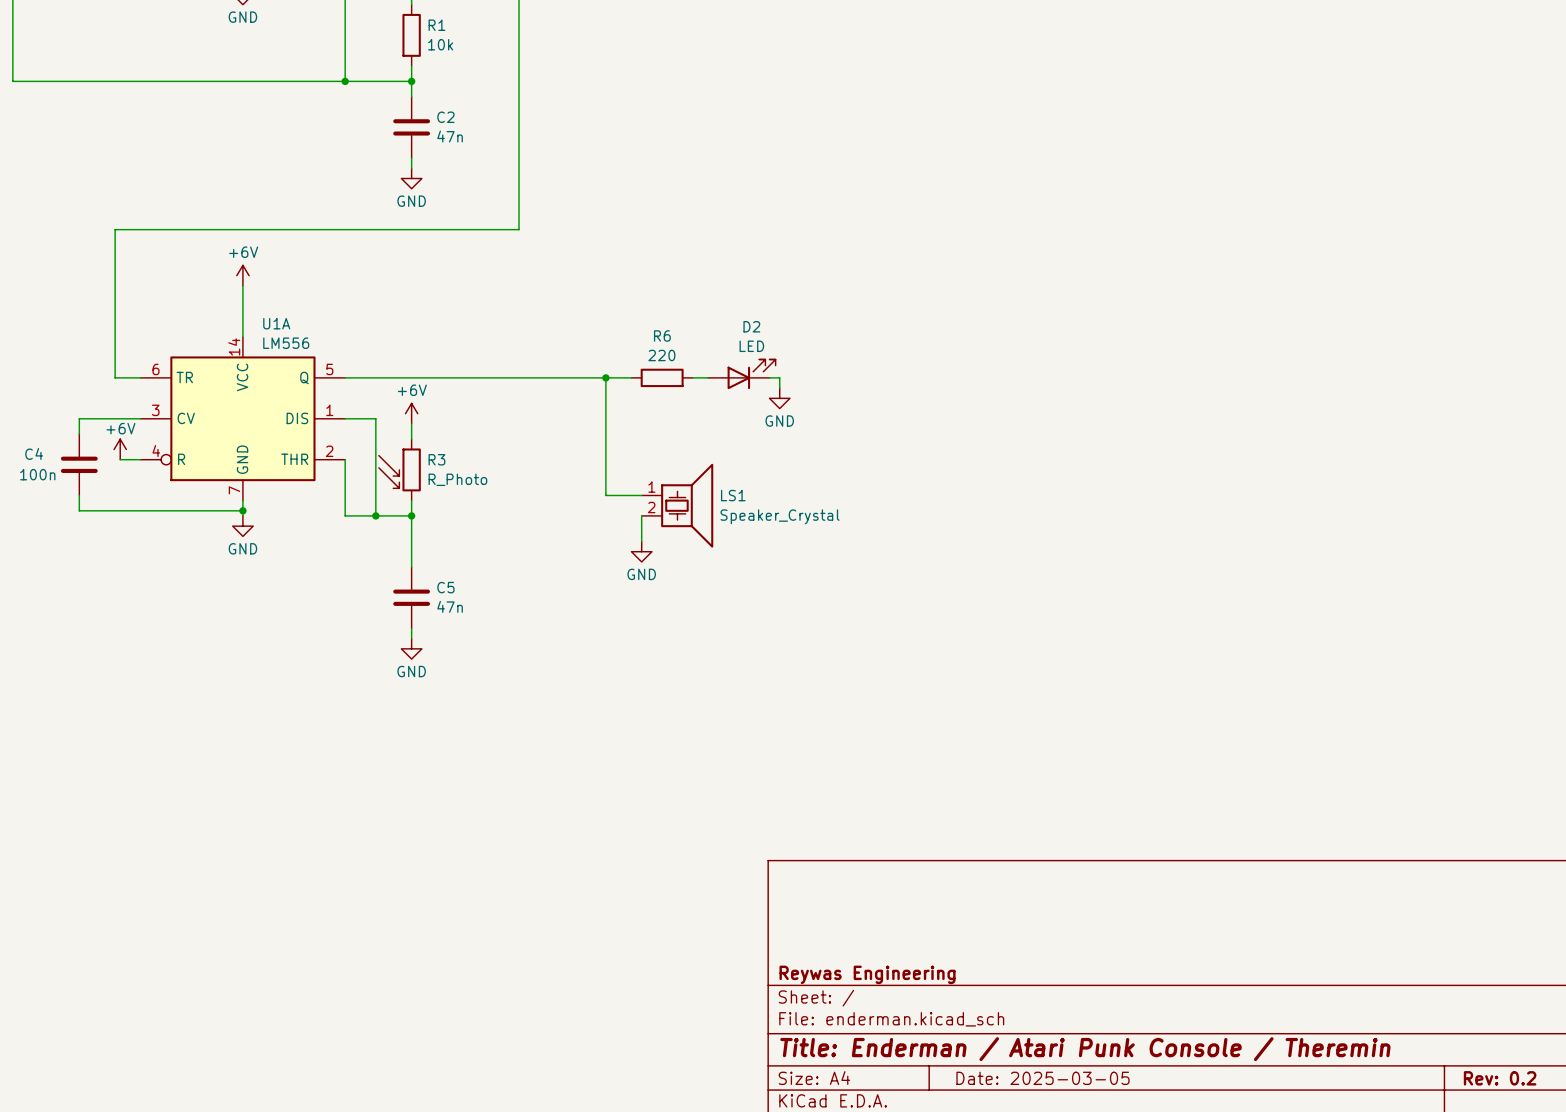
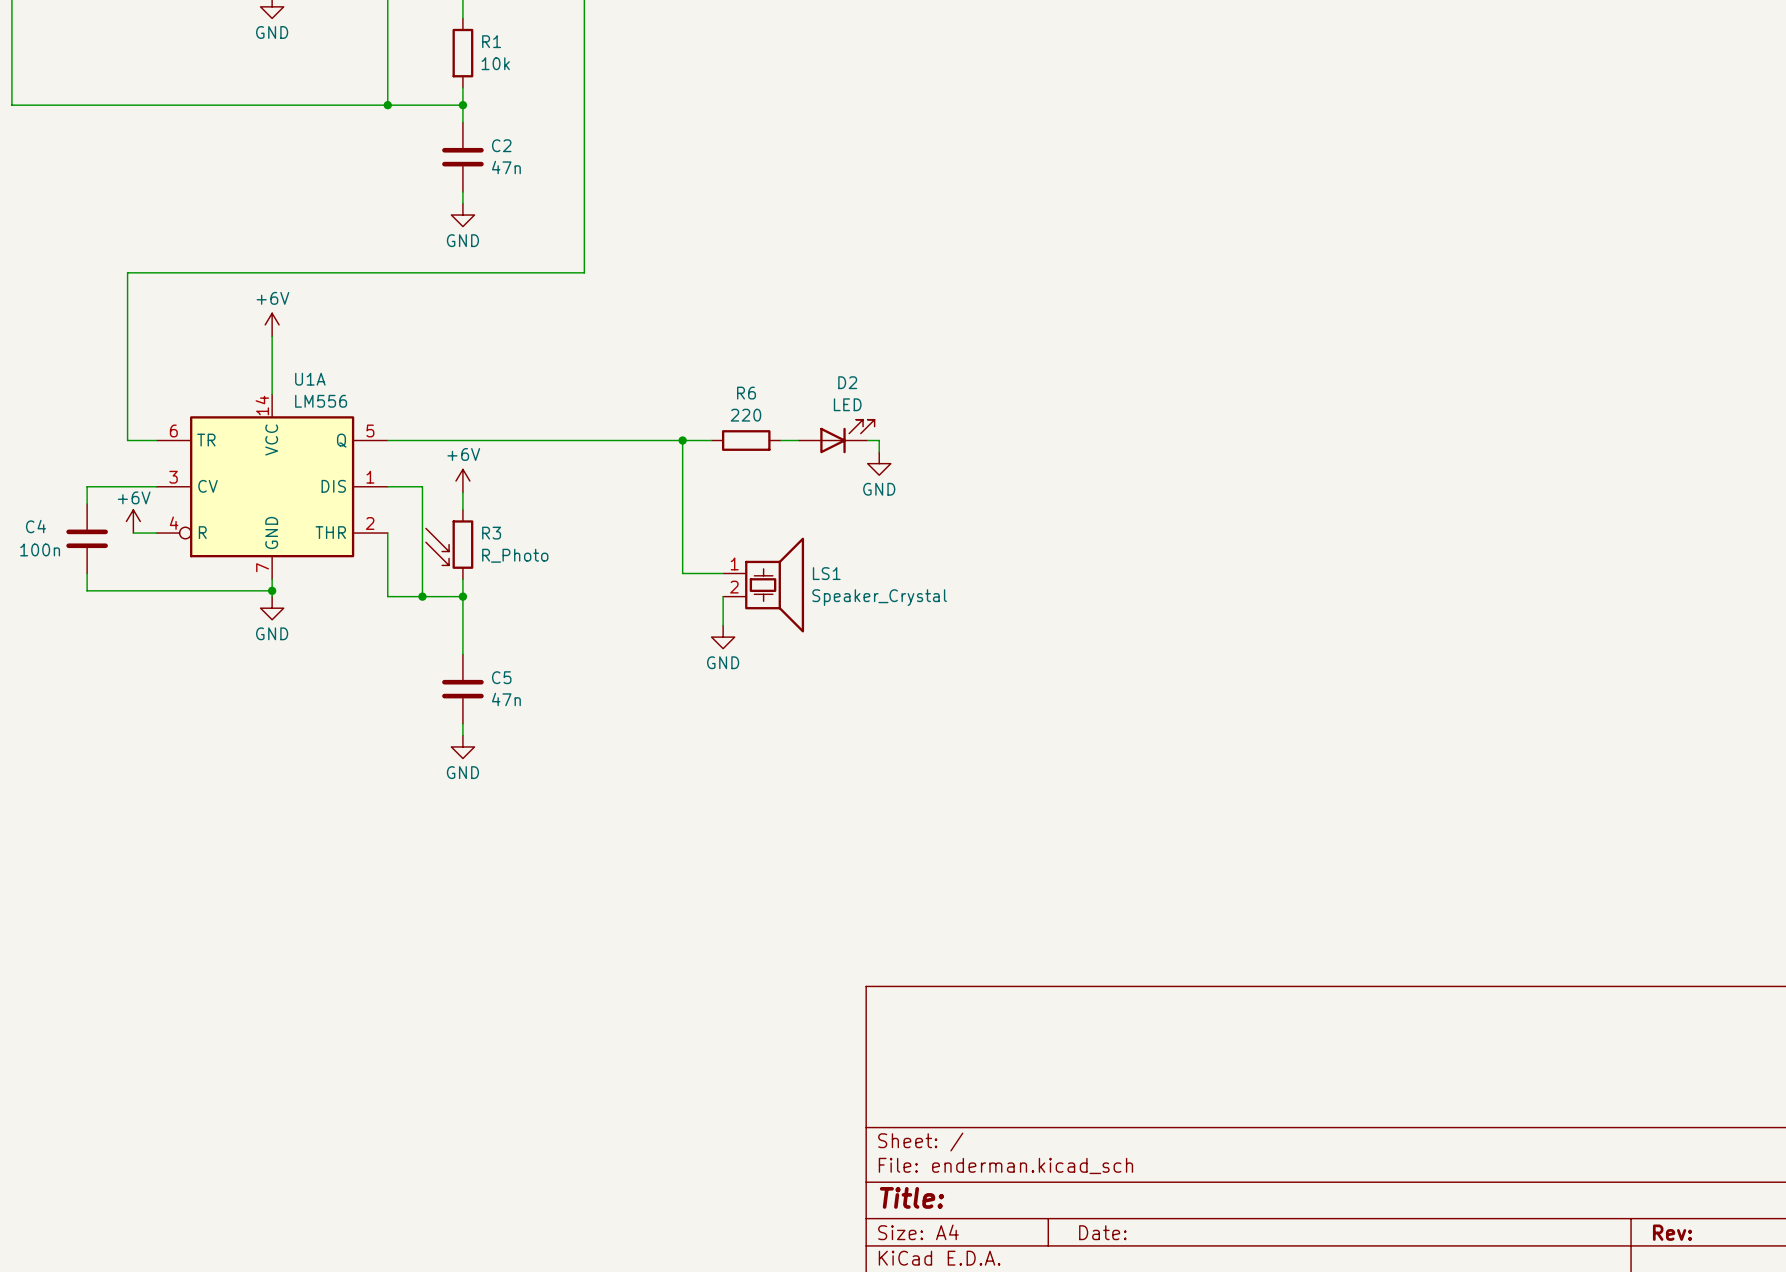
title block: Reywas Engineering (867, 974) -> none
title block: Title: Enderman / Atari Punk Console / Theremin (1085, 1049) -> Title: (911, 1197)
title block: Date: 2025-03-05 (1043, 1078) -> Date: (1102, 1232)
title block: Rev: 0.2 (1500, 1078) -> Rev: (1672, 1232)

